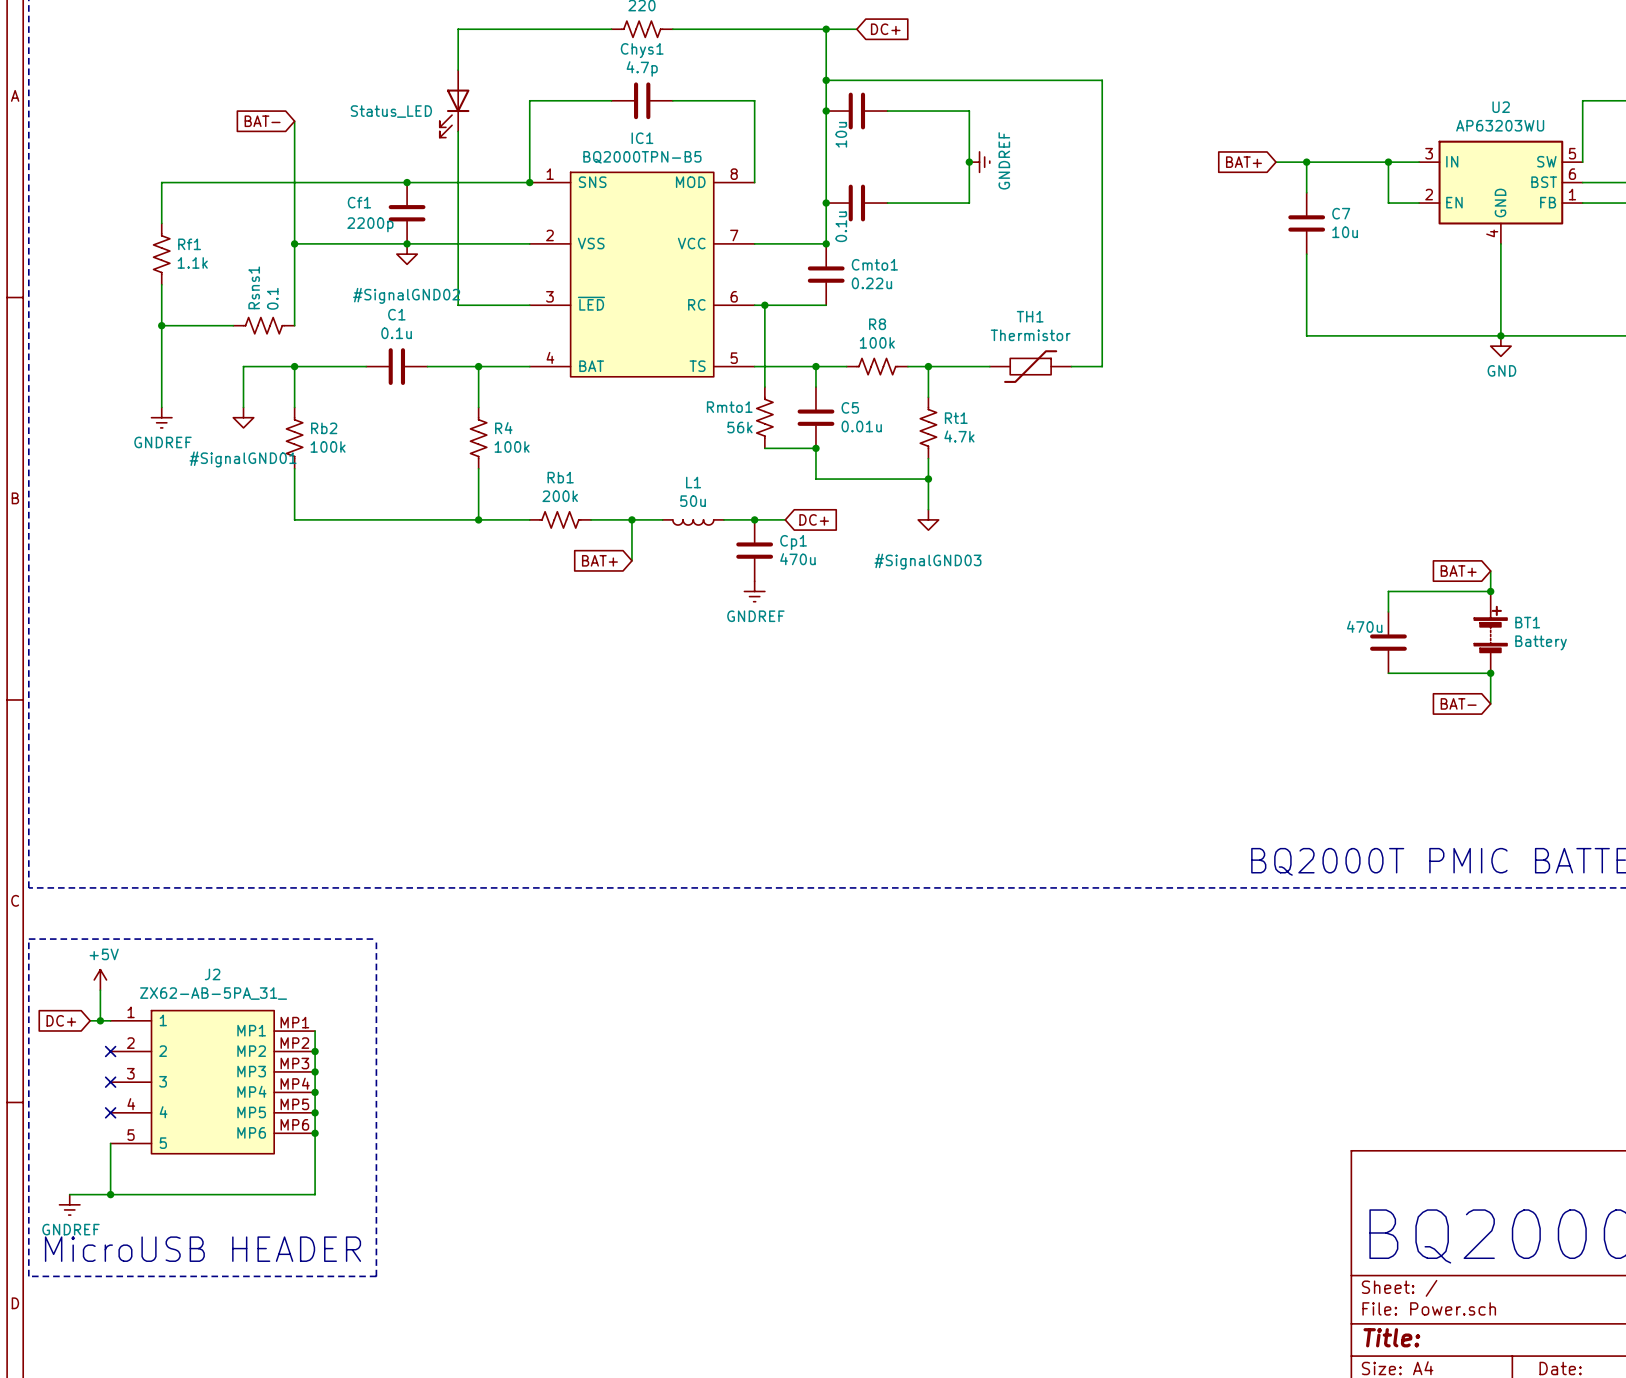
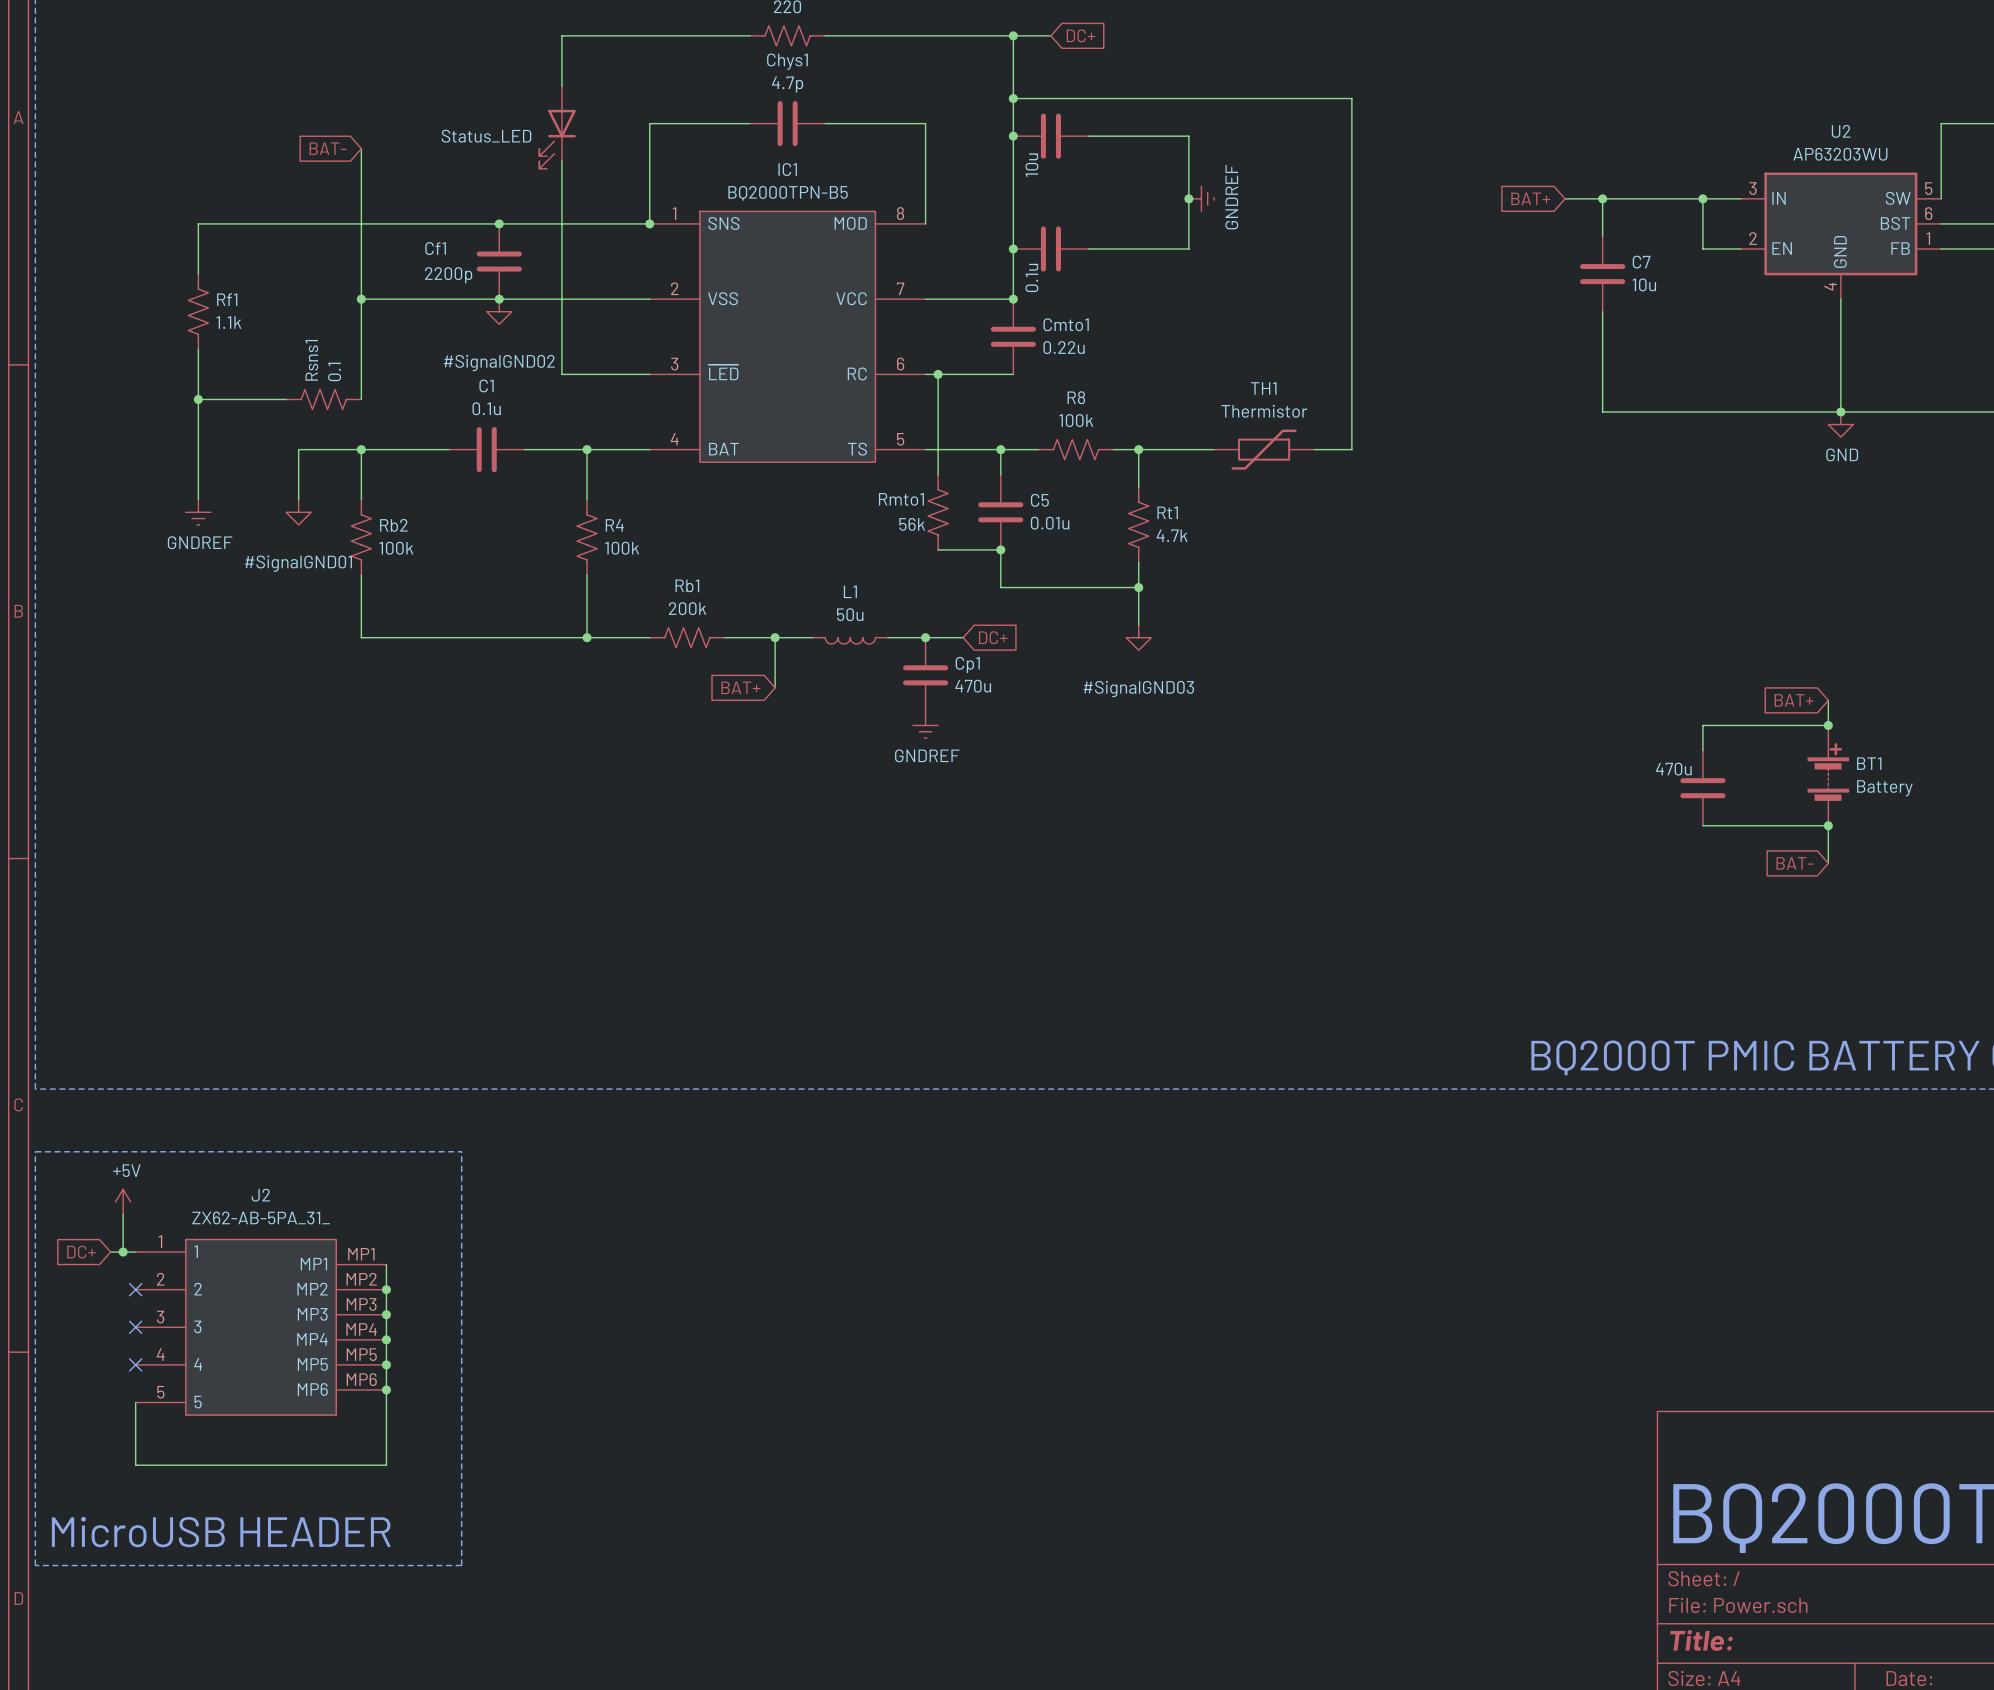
wire: (69, 1194) (110, 1194) -> none
junction: (110, 1194) -> none
power symbol: GNDREF (69, 1204) -> none

